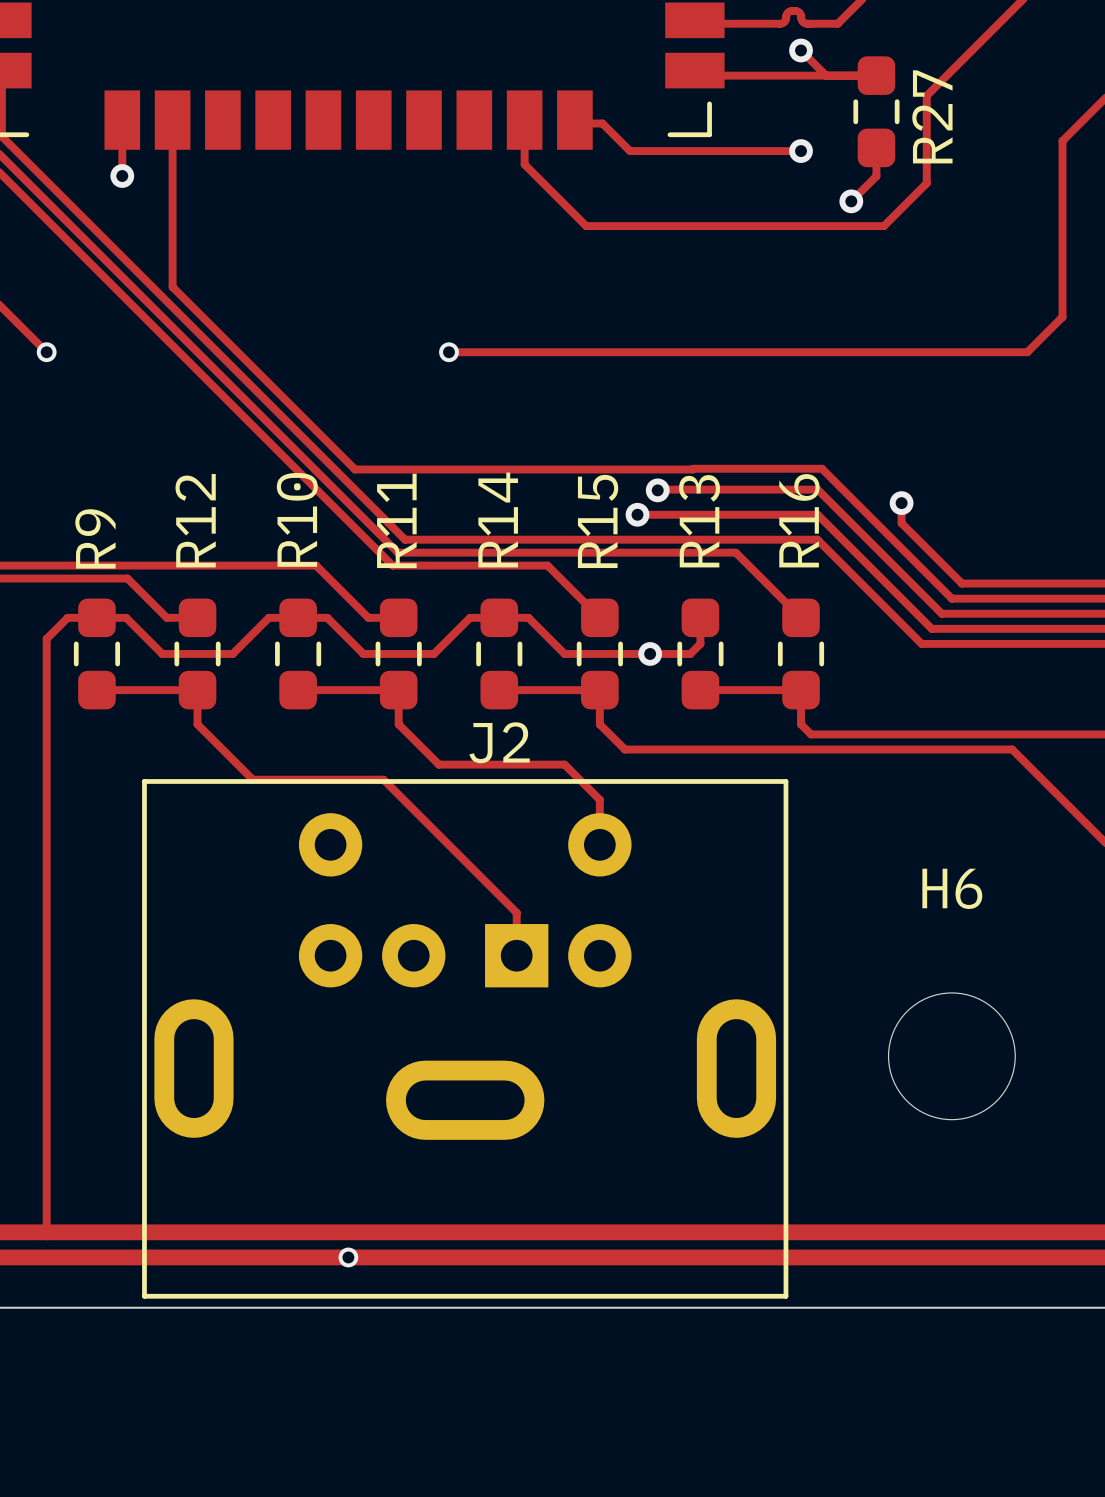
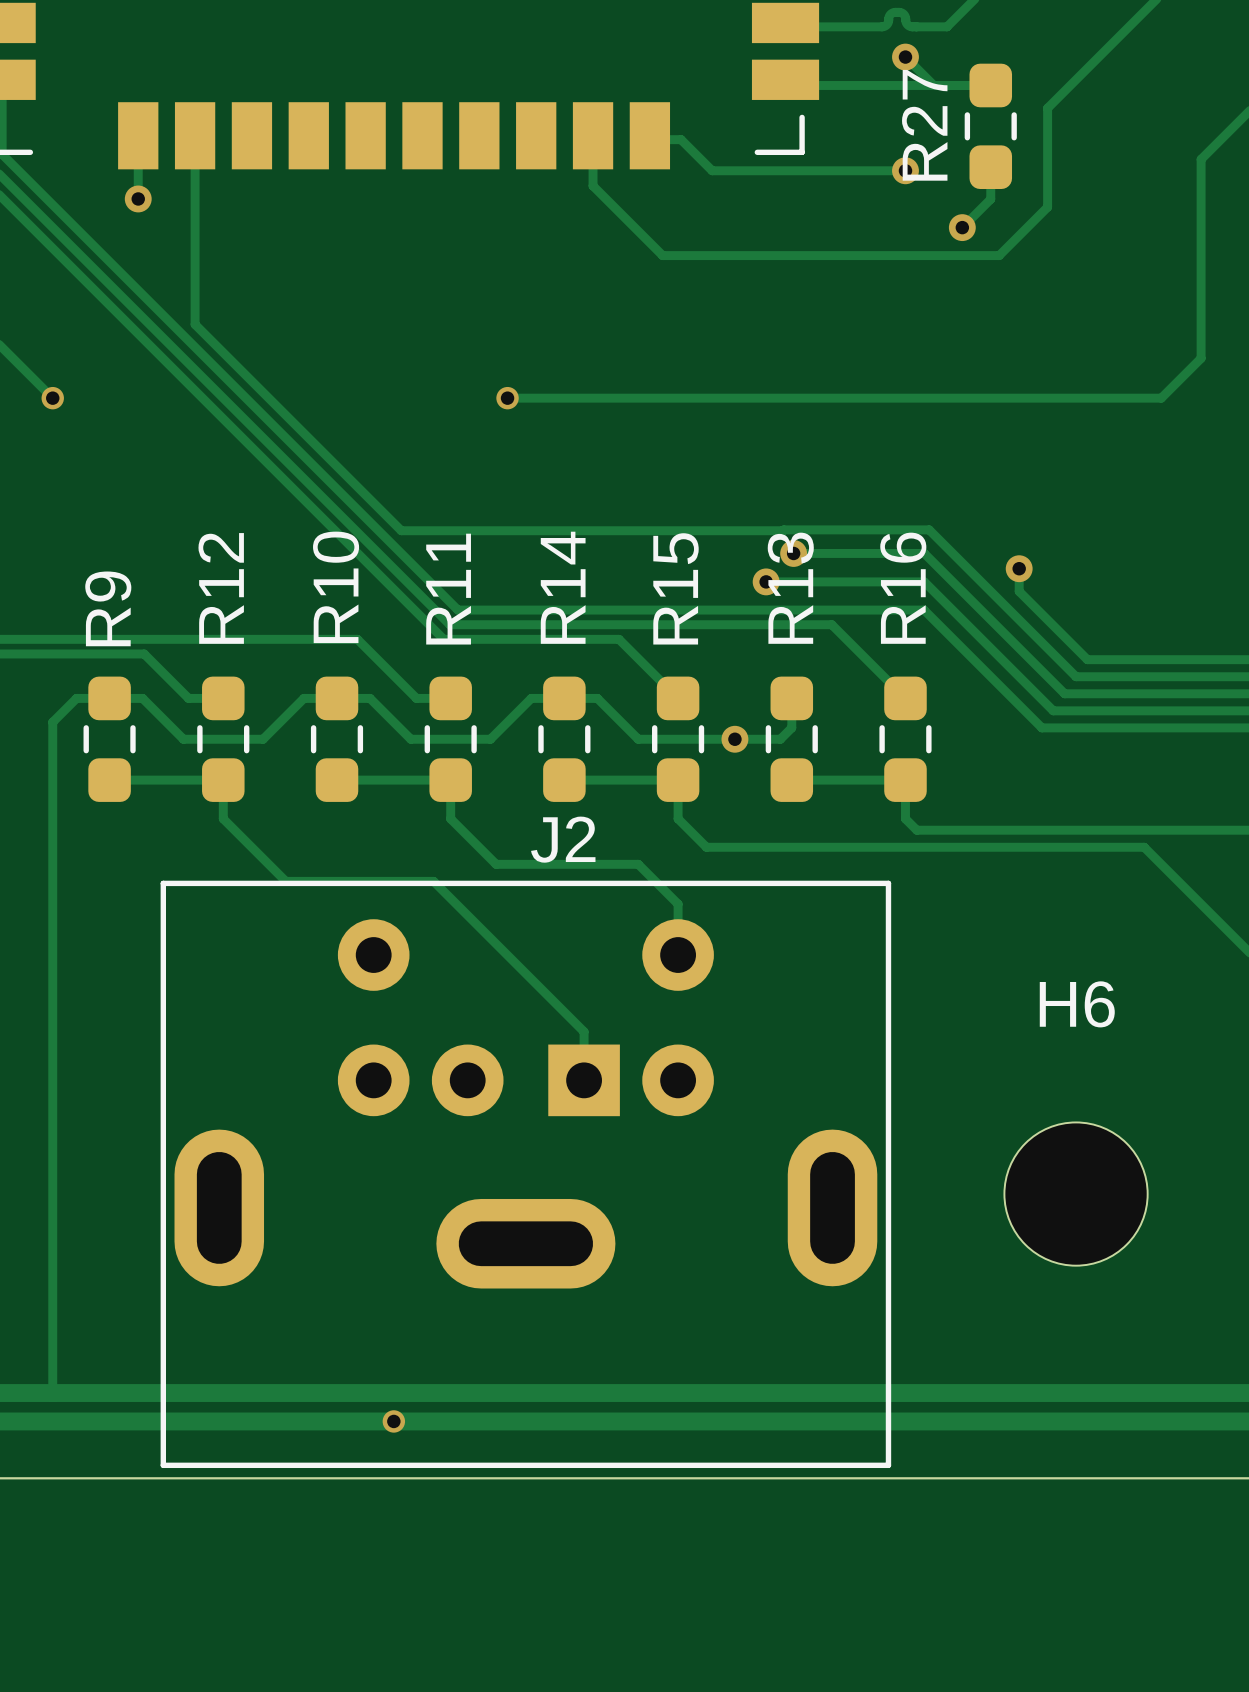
R27 name position: R27 (932, 116) -> R27 (924, 125)
track: (702, 489) (657, 490) -> none
via: none -> (793, 553)
via: (657, 490) -> none
track: (637, 514) (677, 514) -> none
via: (637, 514) -> none
via: none -> (766, 581)

